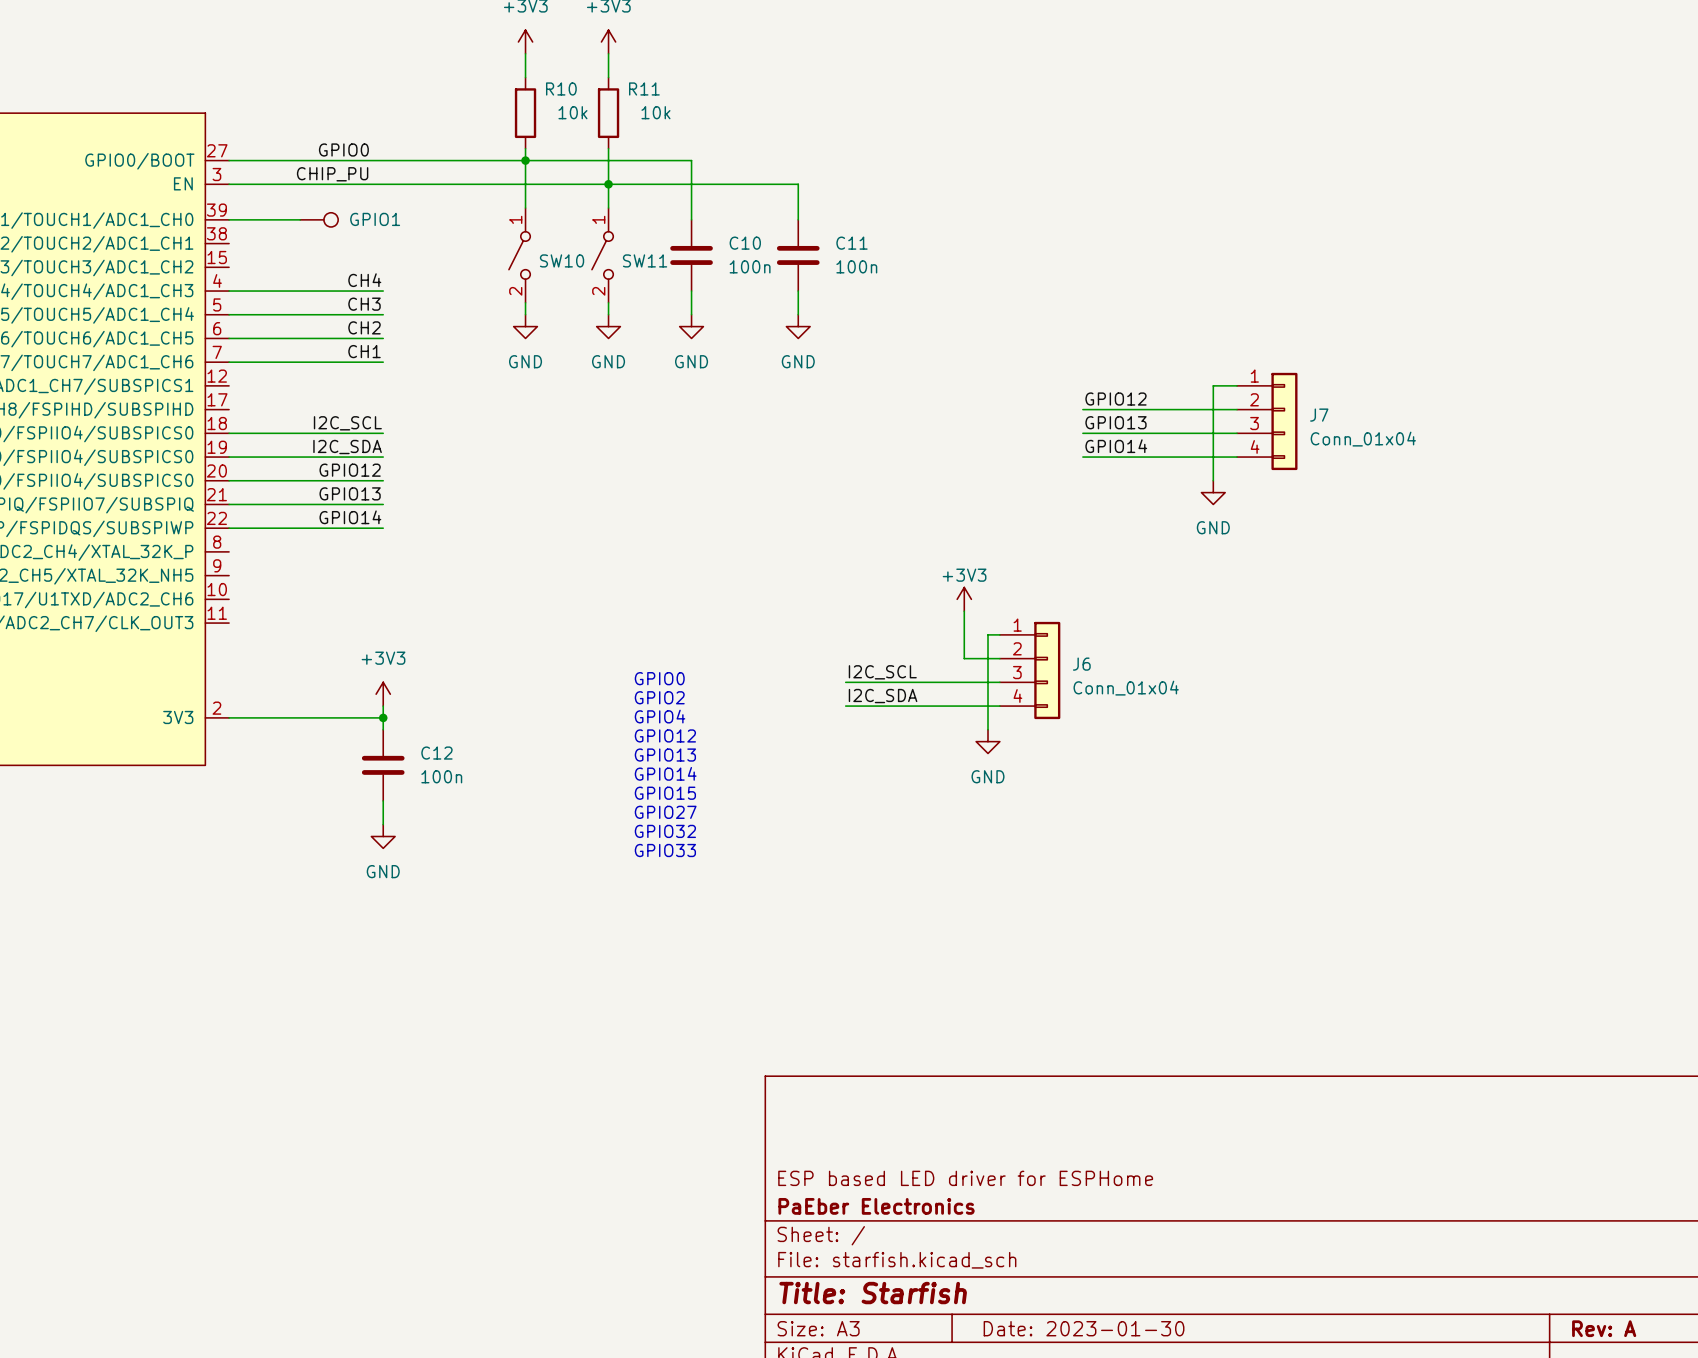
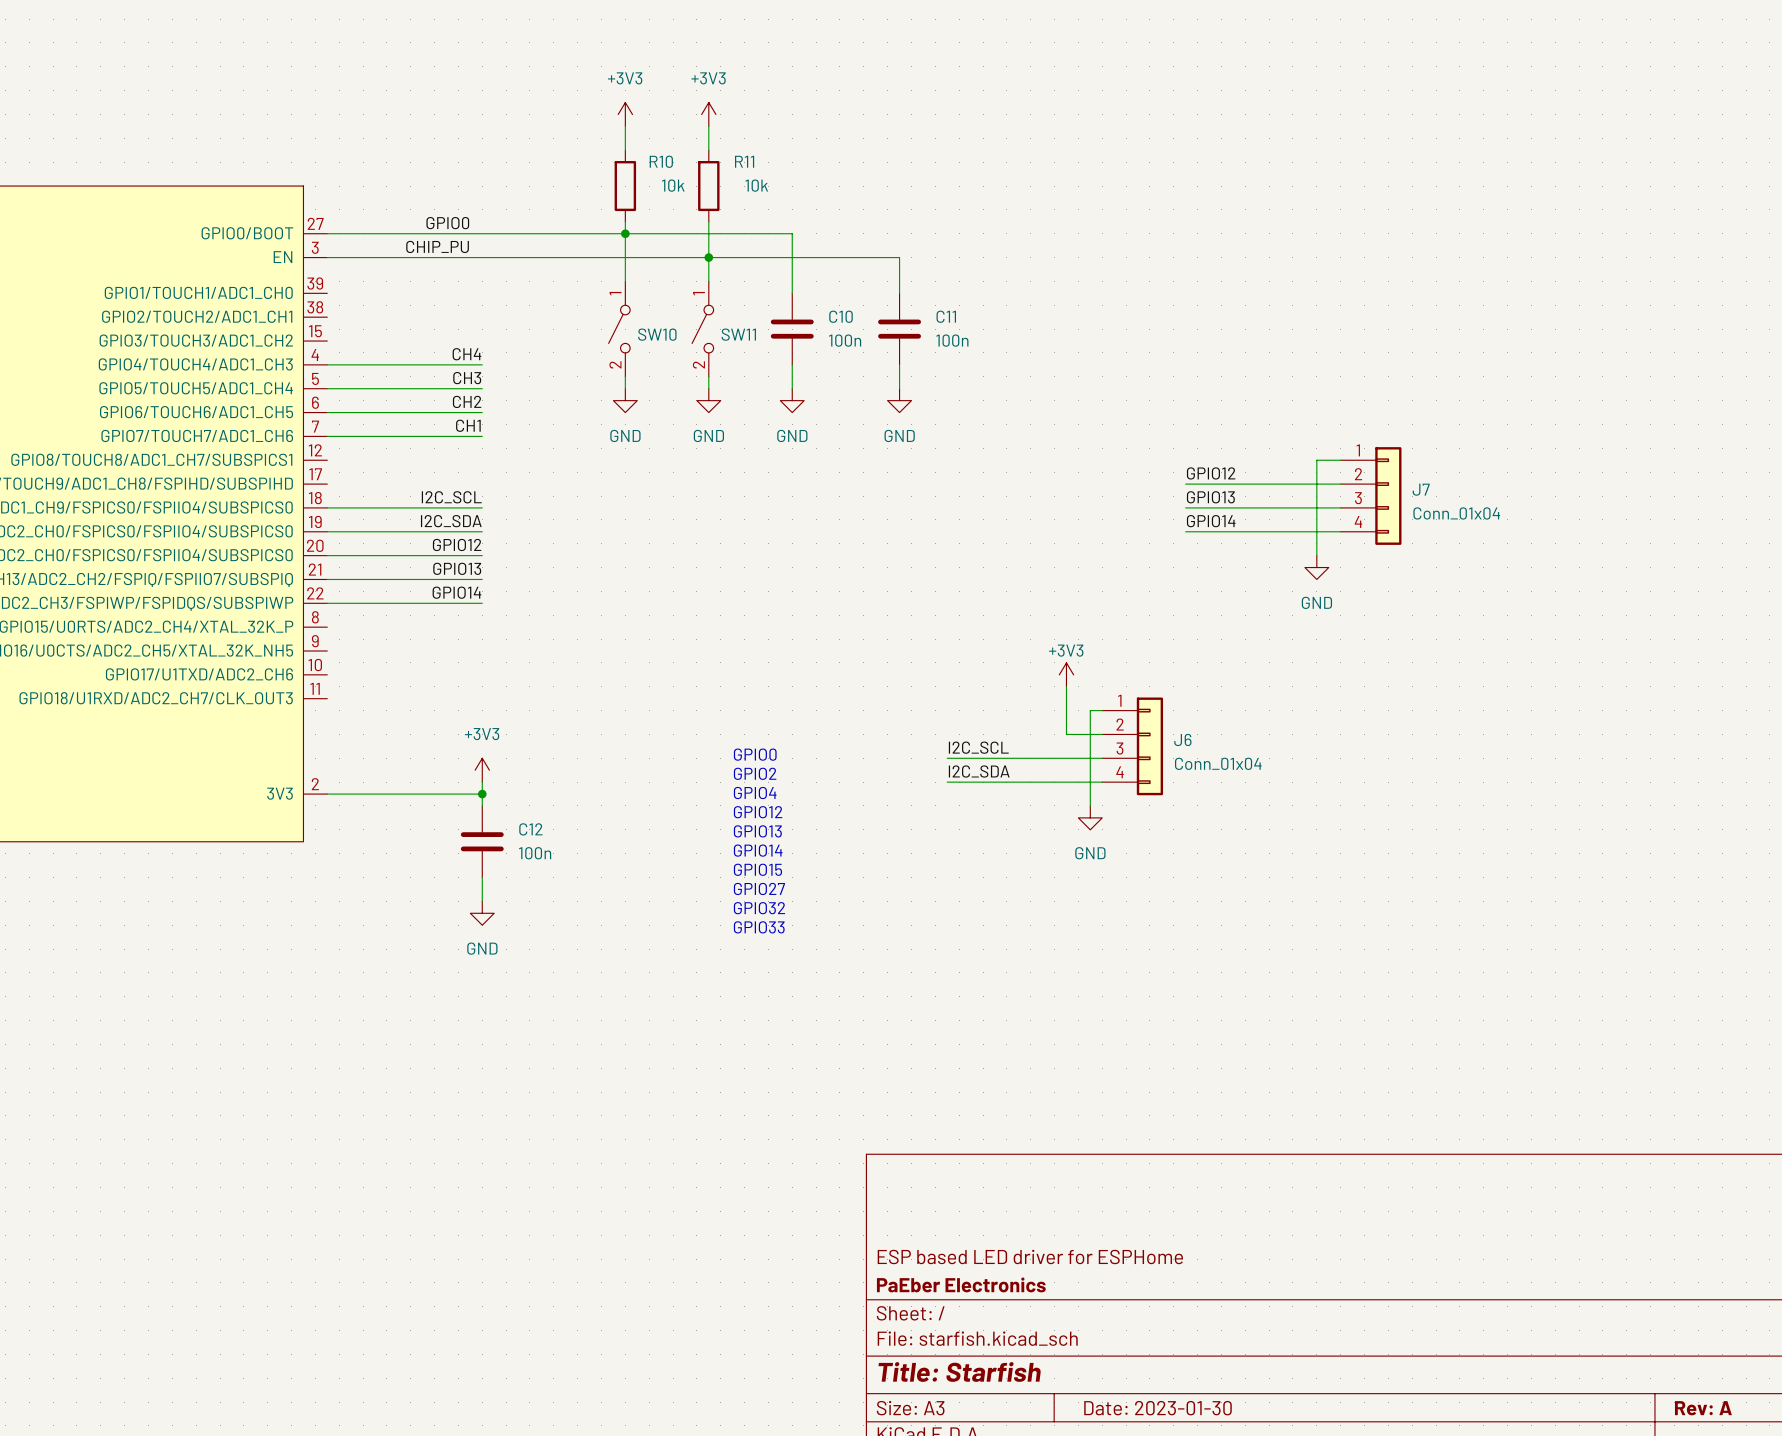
wire: (229, 219) (300, 219) -> none
GPIO1: (319, 219) -> none

